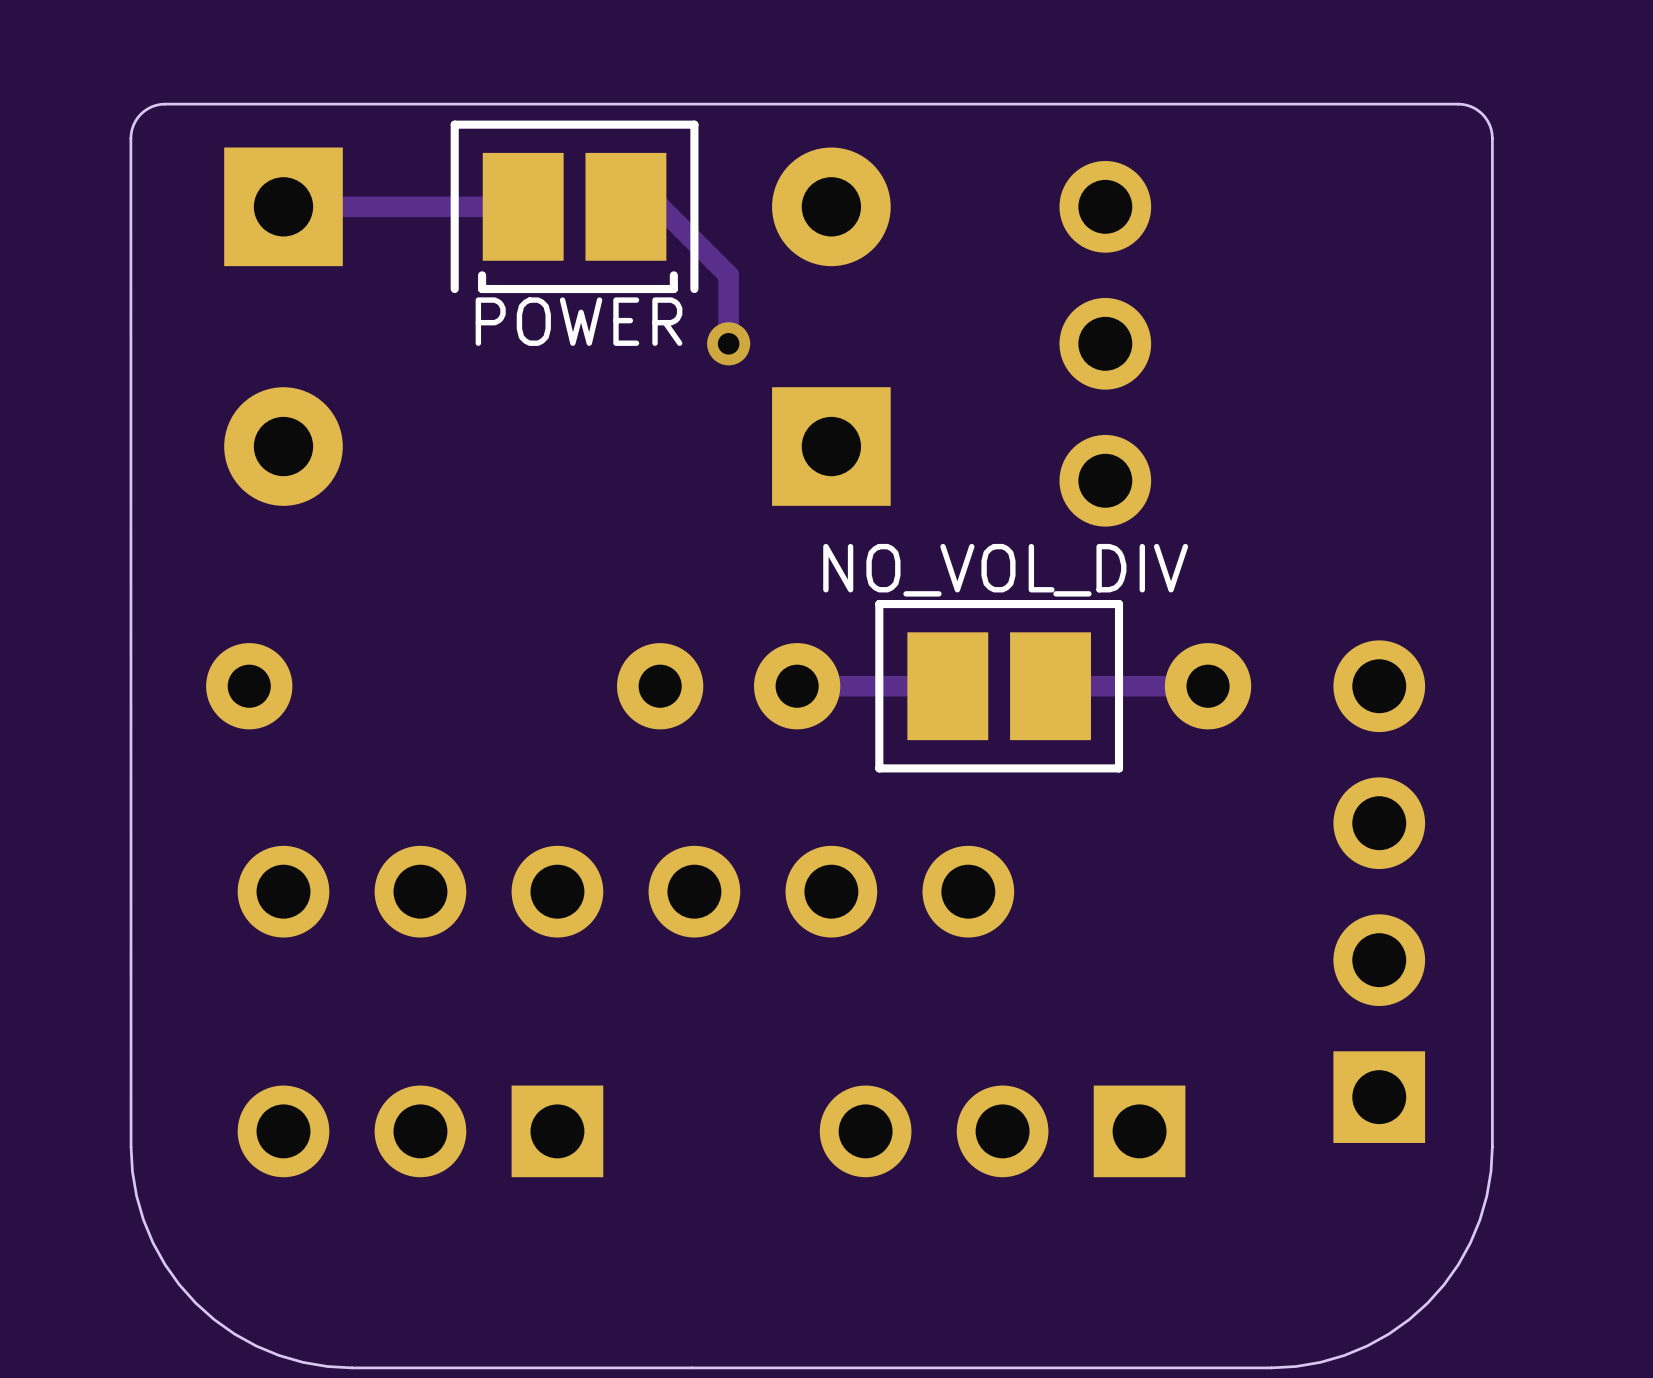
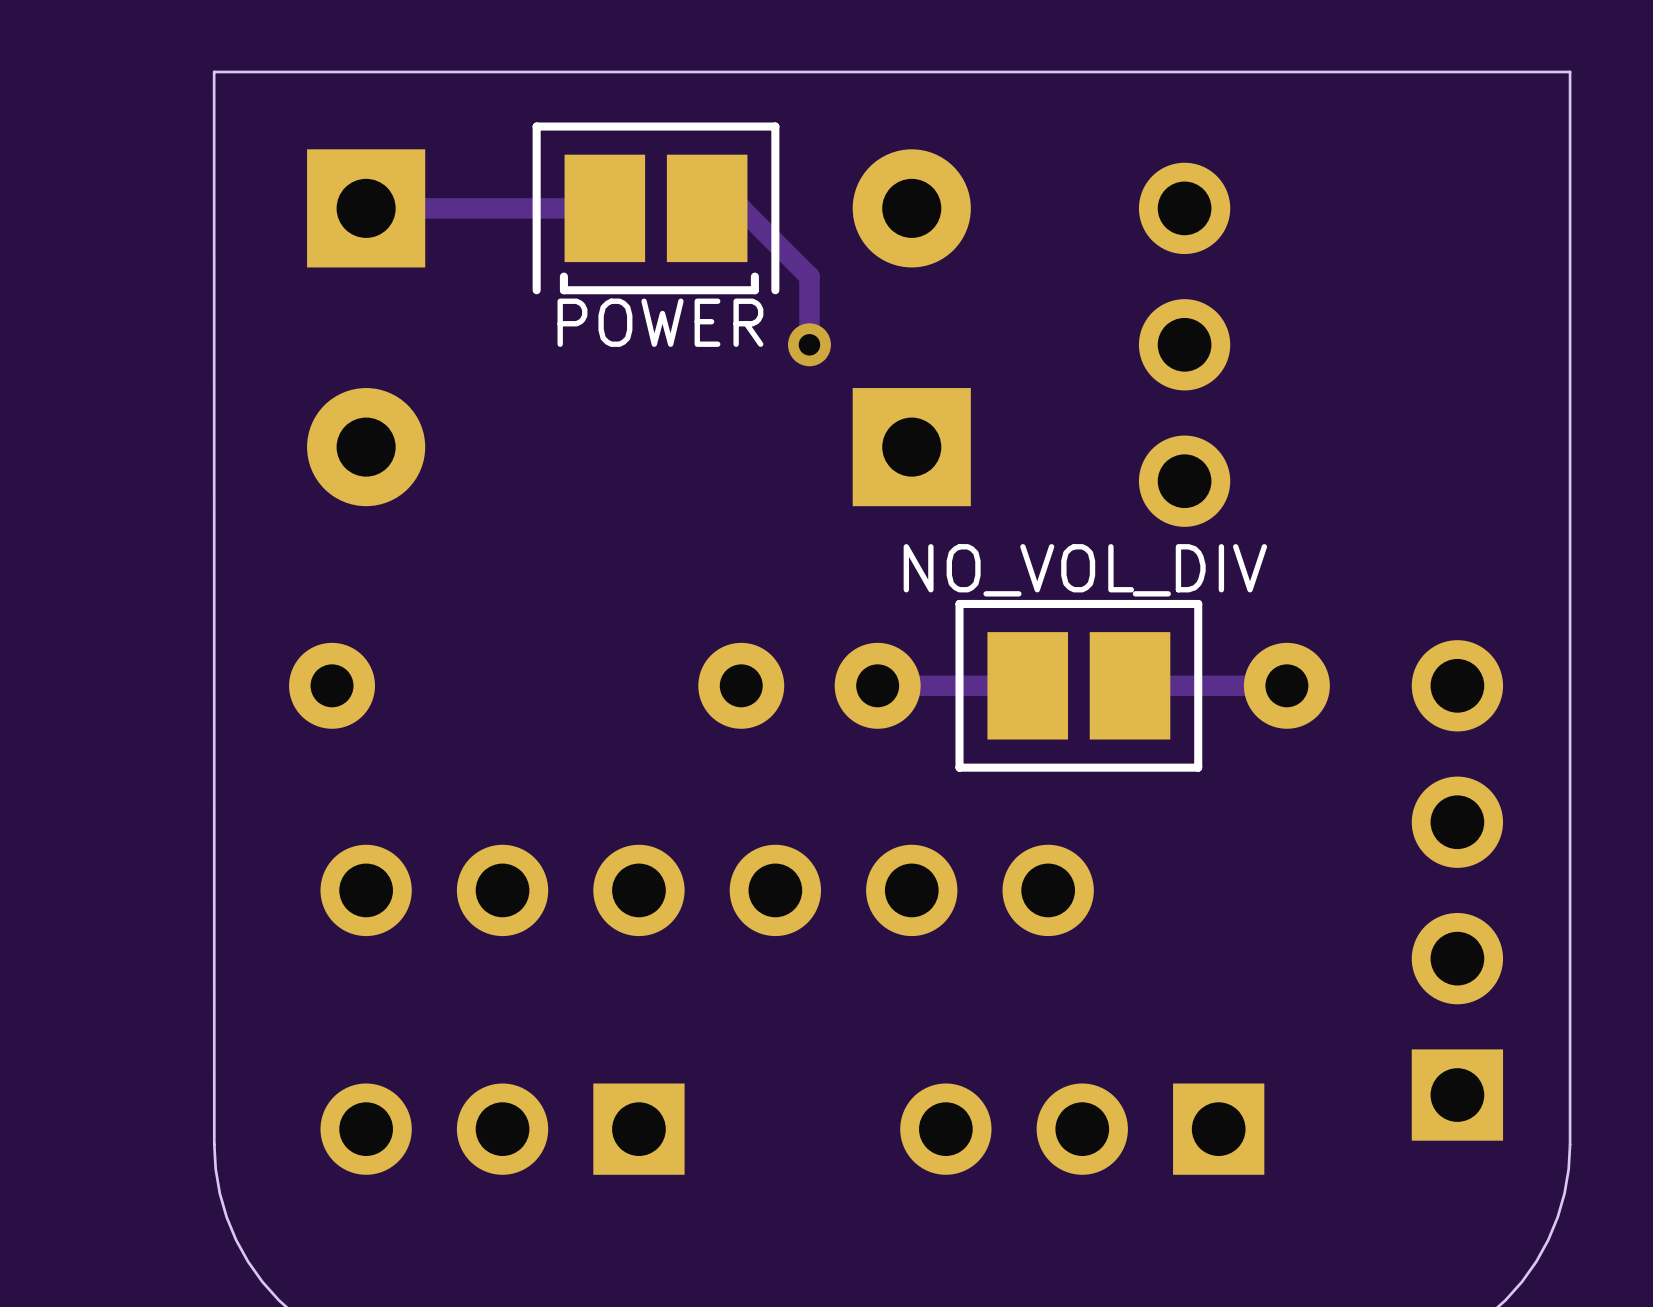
board edge: (165, 104) (1458, 104) (1471, 106) (1482, 114) (1489, 125) (1492, 138) -> (214, 140) (214, 71) (1570, 71) (1570, 140)
board edge: (165, 104) (152, 106) (140, 114) (133, 125) (130, 138) -> none

